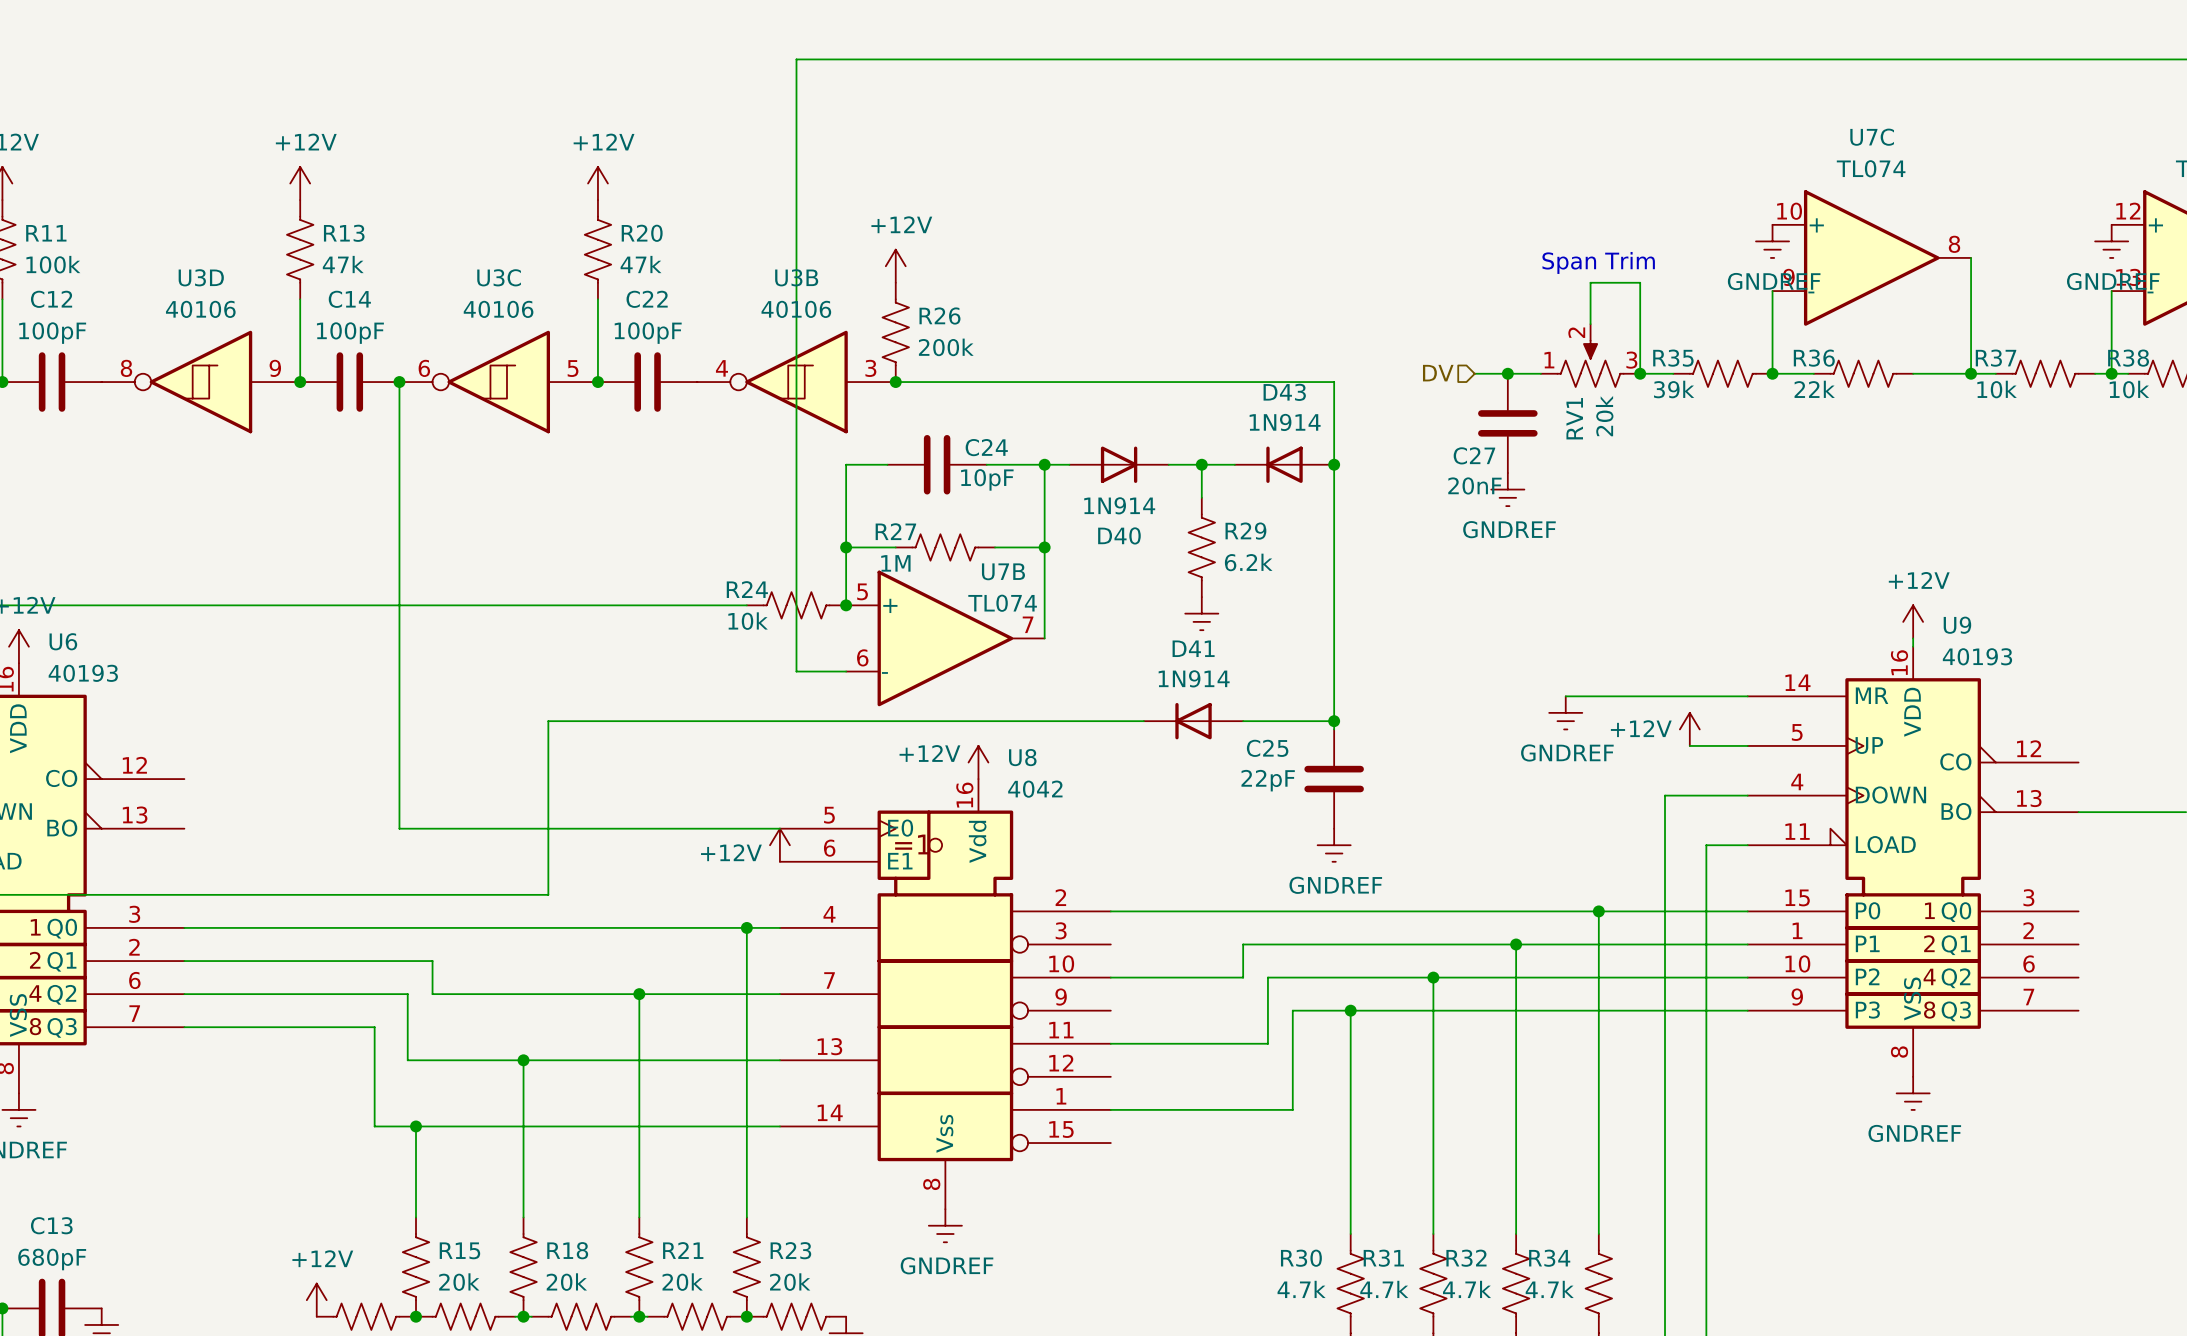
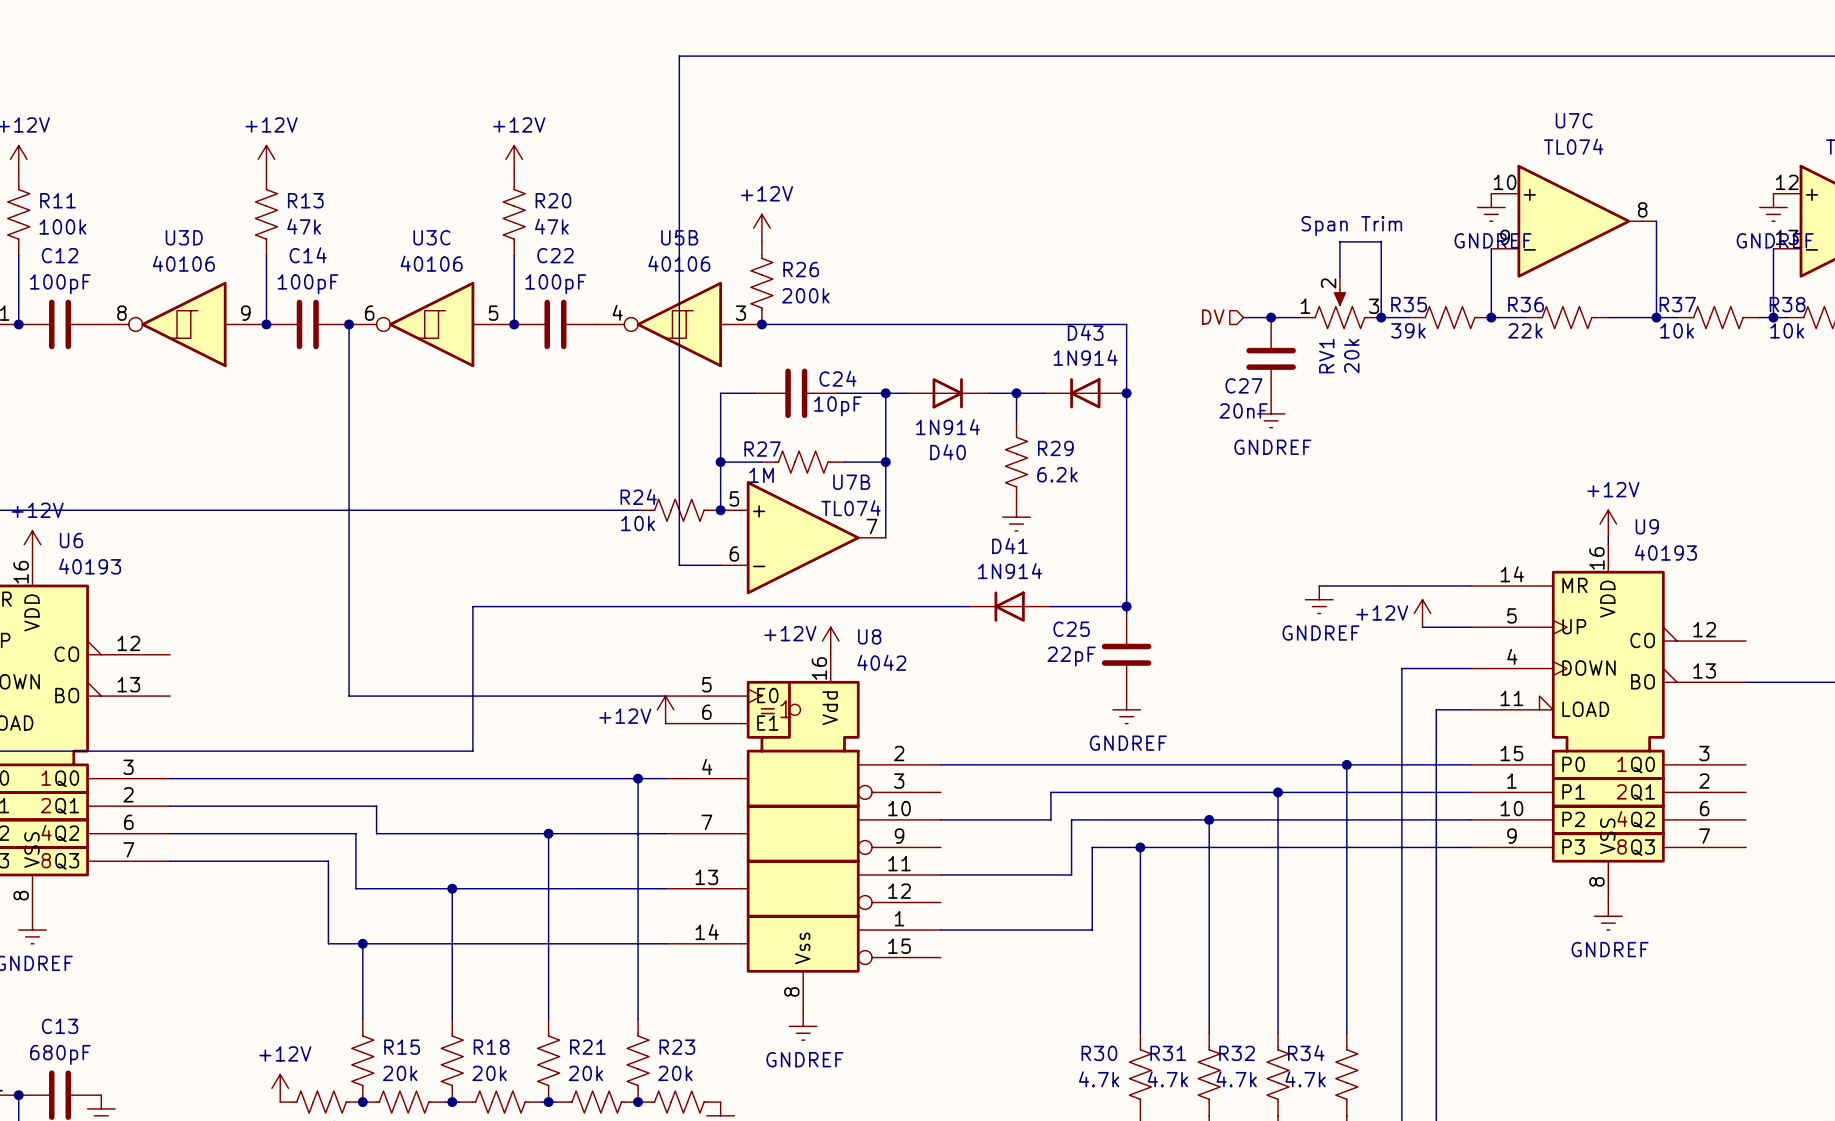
U3B name: U3B (796, 277) -> U5B (679, 237)

